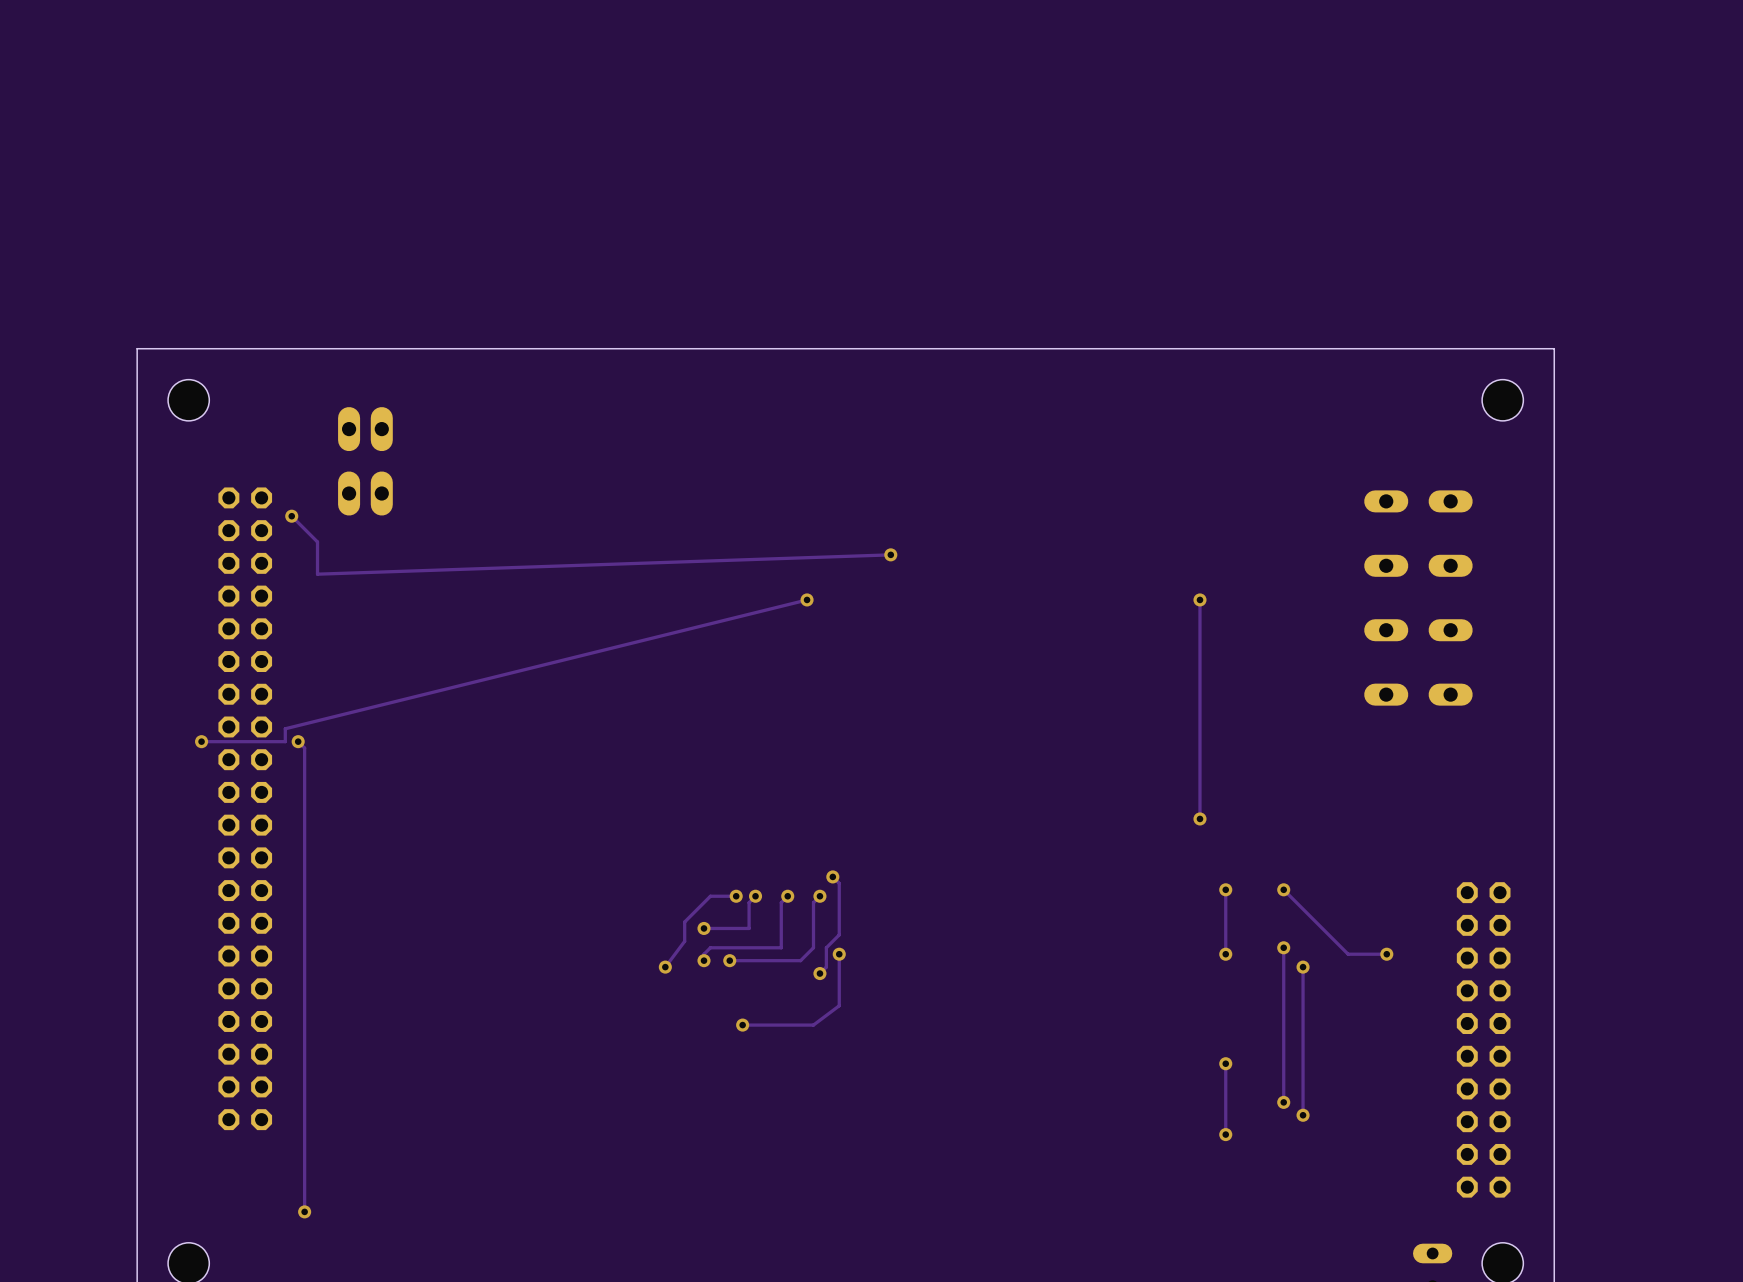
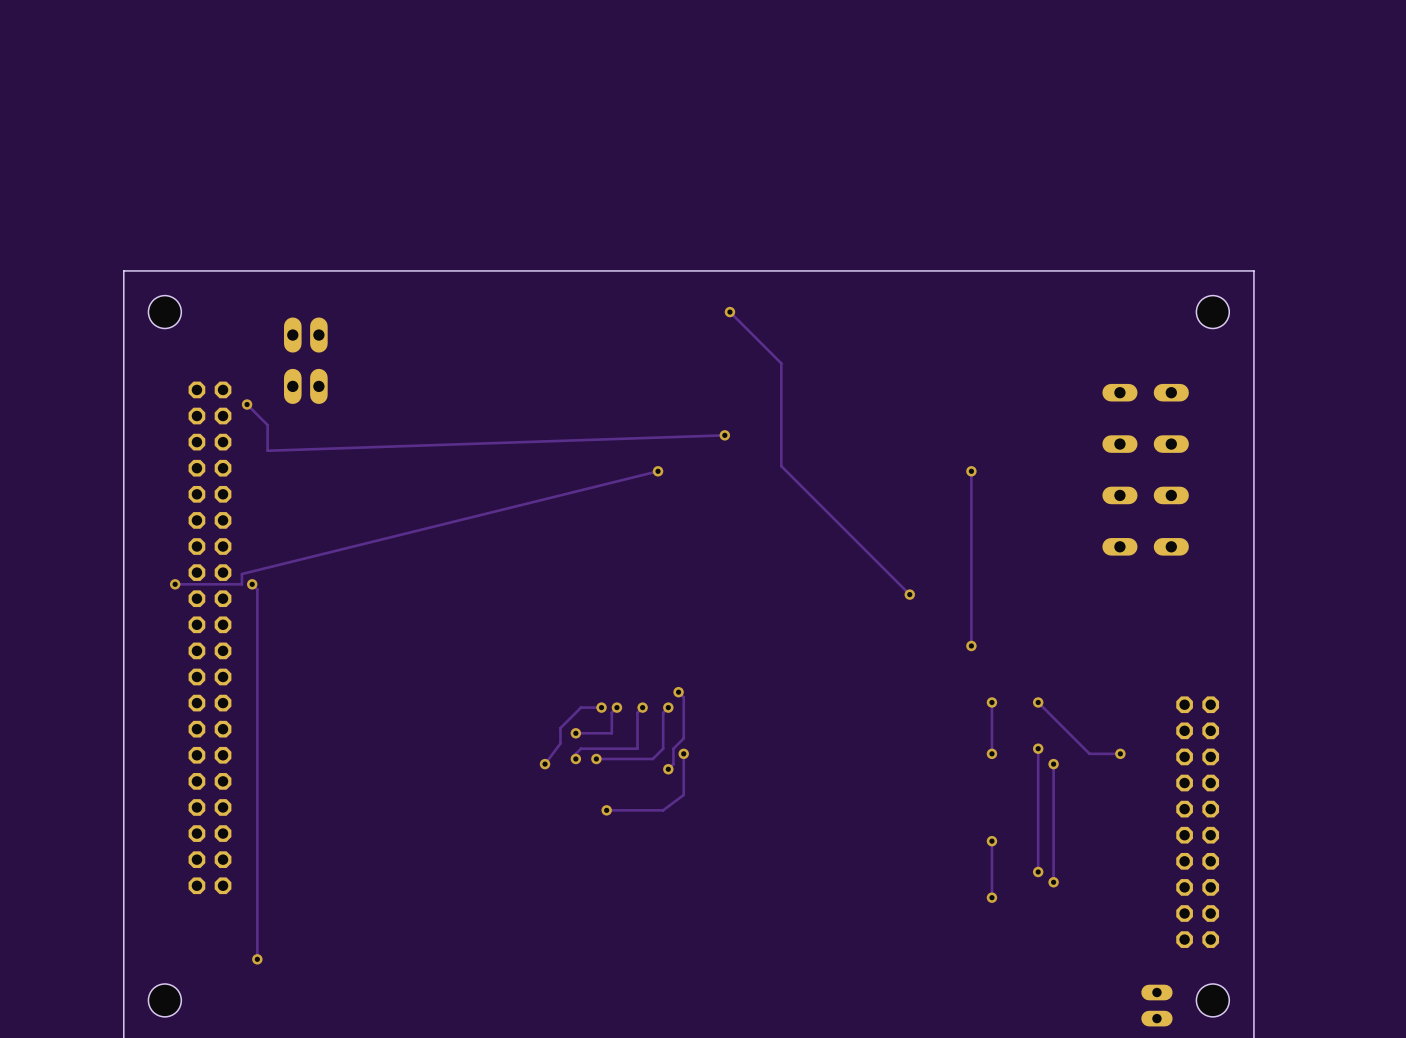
track: none -> (729, 312) (781, 363) (781, 466) (909, 594)
via: none -> (729, 312)
via: none -> (909, 594)

